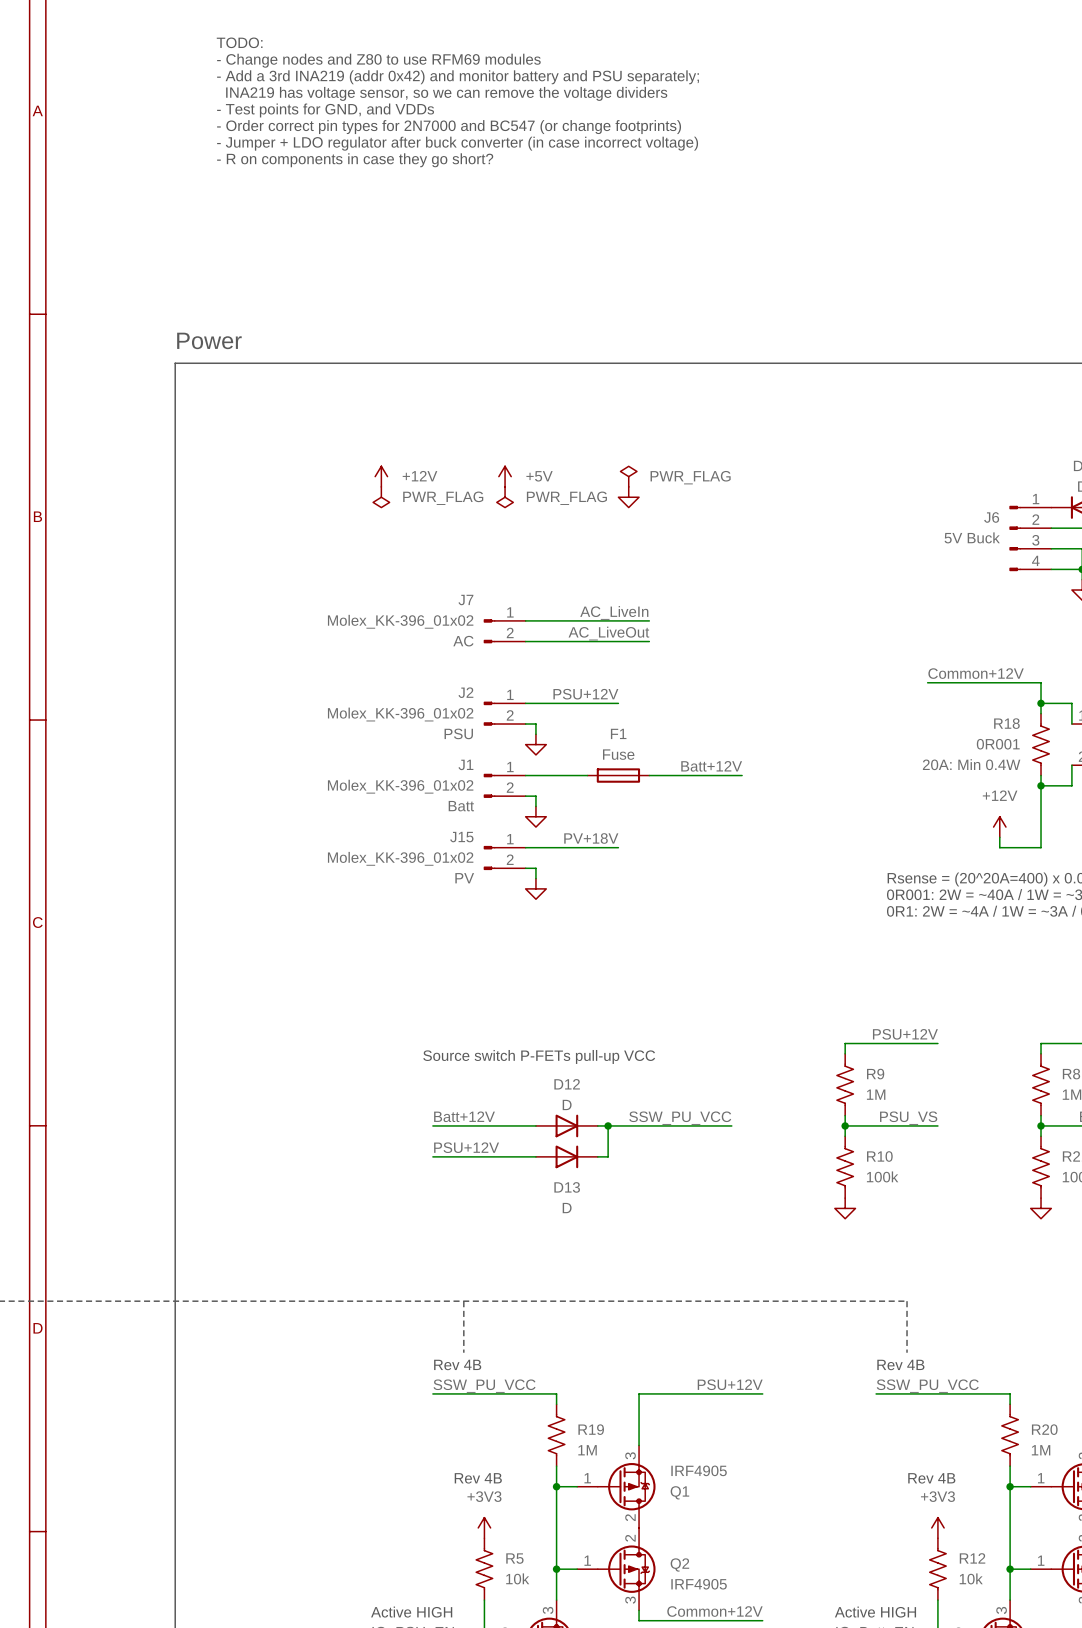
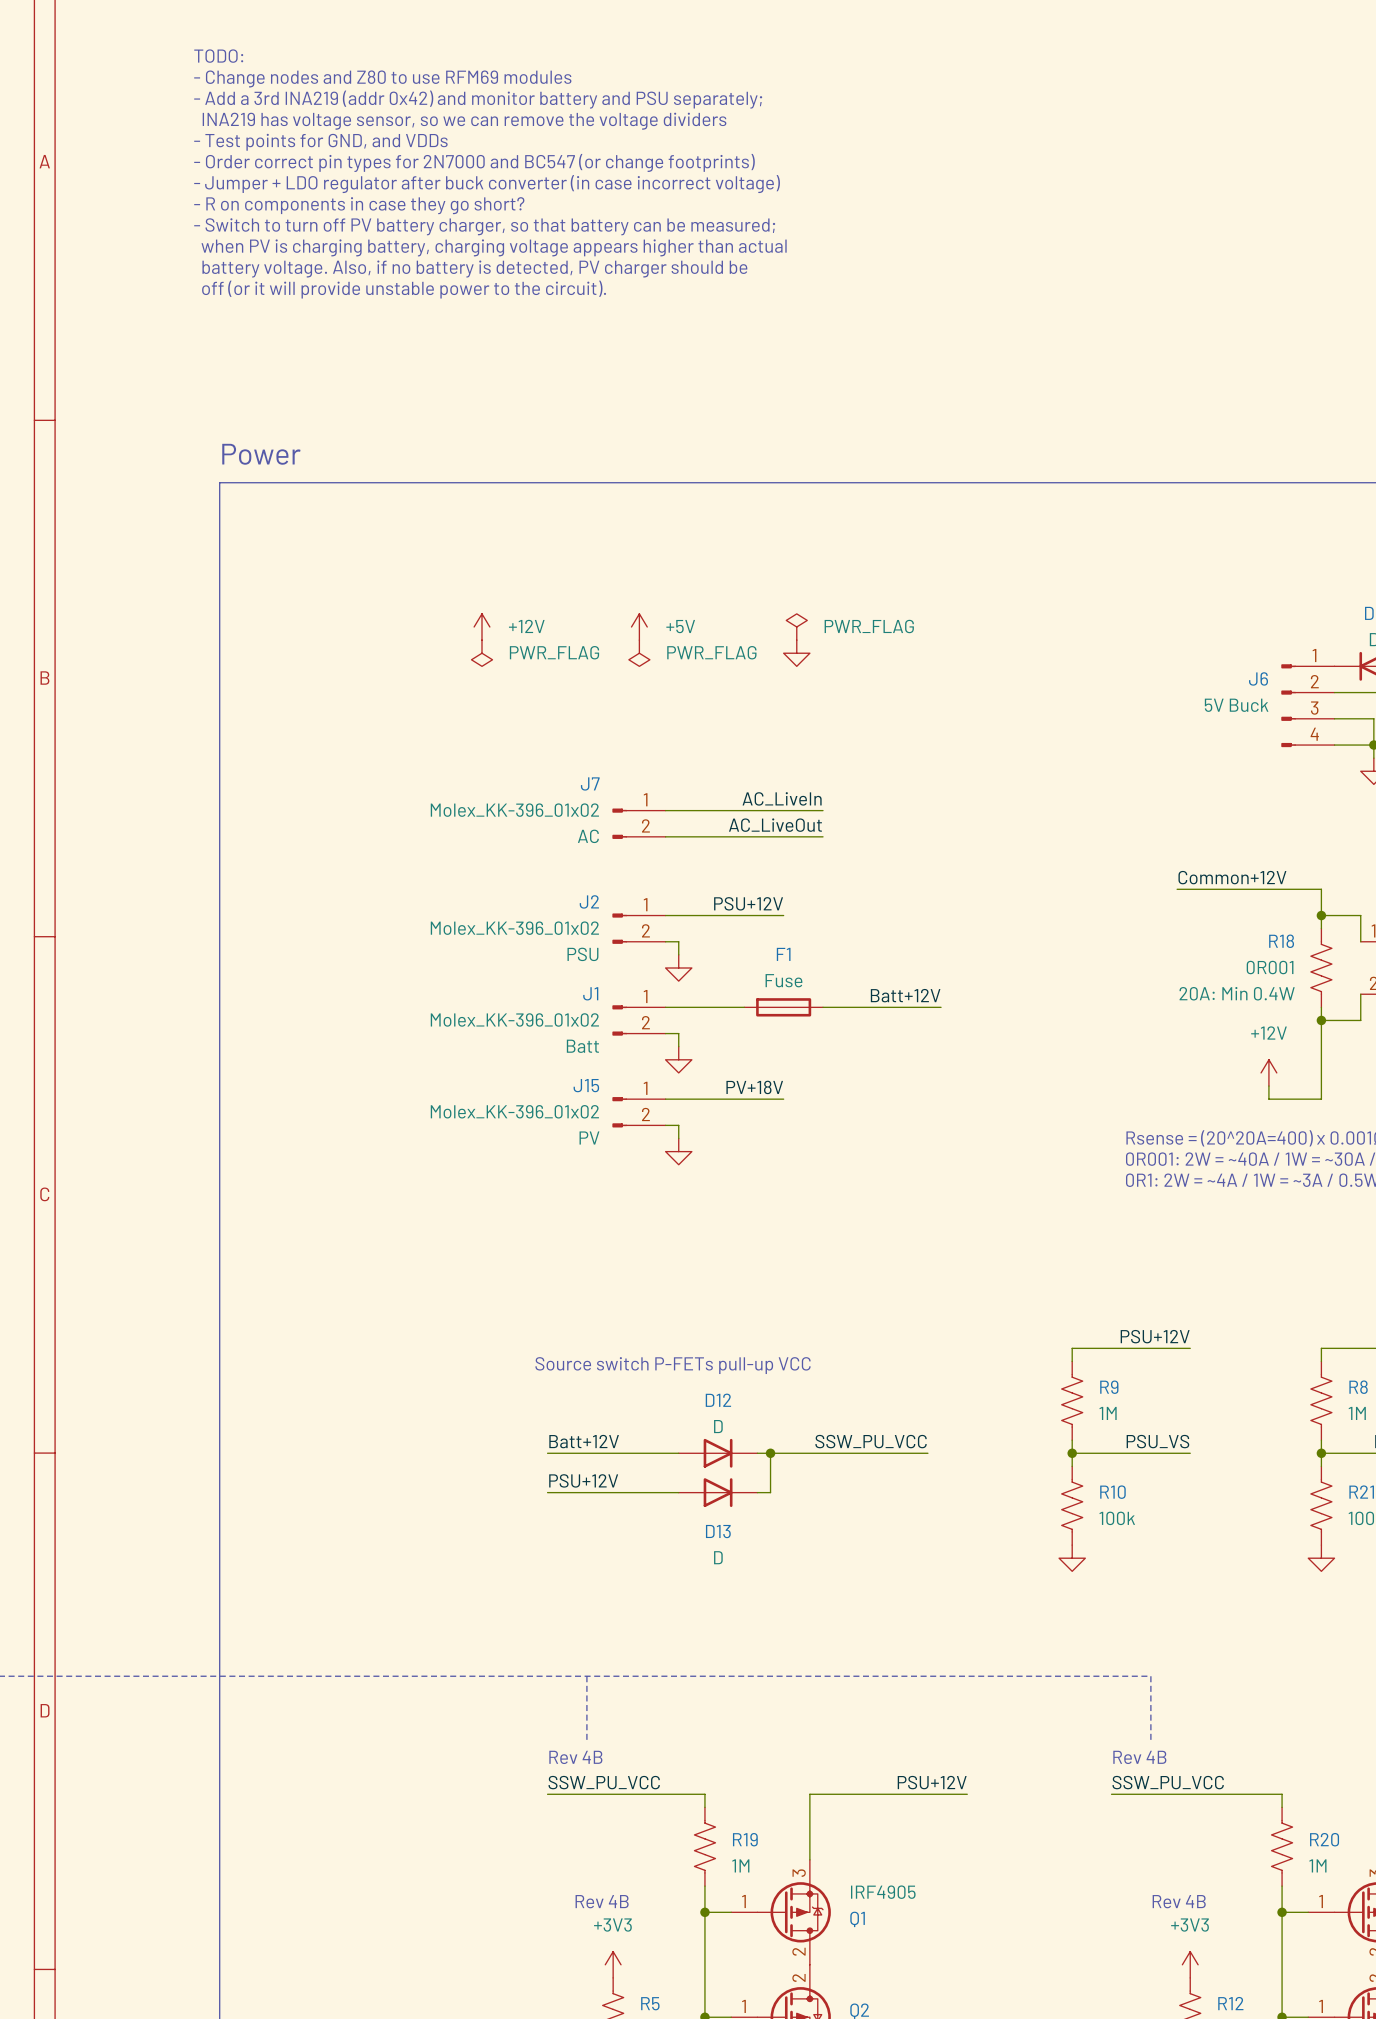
text position: TODO: (239, 42) -> TODO: (218, 56)
text position: - Change nodes and Z80 to use RFM69 modules (378, 60) -> - Change nodes and Z80 to use RFM69 modules (382, 78)
text position: - Add a 3rd INA219 (addr 0x42) and monitor battery and PSU separately; (458, 77) -> - Add a 3rd INA219 (addr 0x42) and monitor battery and PSU separately; (478, 99)
text position: INA219 has voltage sensor, so we can remove the voltage dividers (446, 93) -> INA219 has voltage sensor, so we can remove the voltage dividers (464, 121)
text position: - Test points for GND, and VDDs (325, 110) -> - Test points for GND, and VDDs (320, 142)
text position: - Order correct pin types for 2N7000 and BC547 (or change footprints) (449, 127) -> - Order correct pin types for 2N7000 and BC547 (or change footprints) (474, 162)
text position: - Jumper + LDO regulator after buck converter (in case incorrect voltage) (457, 143) -> - Jumper + LDO regulator after buck converter (in case incorrect voltage) (487, 184)
text position: - R on components in case they go short? (355, 160) -> - R on components in case they go short? (359, 205)
text: none -> - Switch to turn off PV battery charger, so that battery can be measured; (484, 226)
text: none -> when PV is charging battery, charging voltage appears higher than actual (494, 247)
text: none -> battery voltage. Also, if no battery is detected, PV charger should be (474, 269)
text: none -> off (or it will provide unstable power to the circuit). (404, 289)

